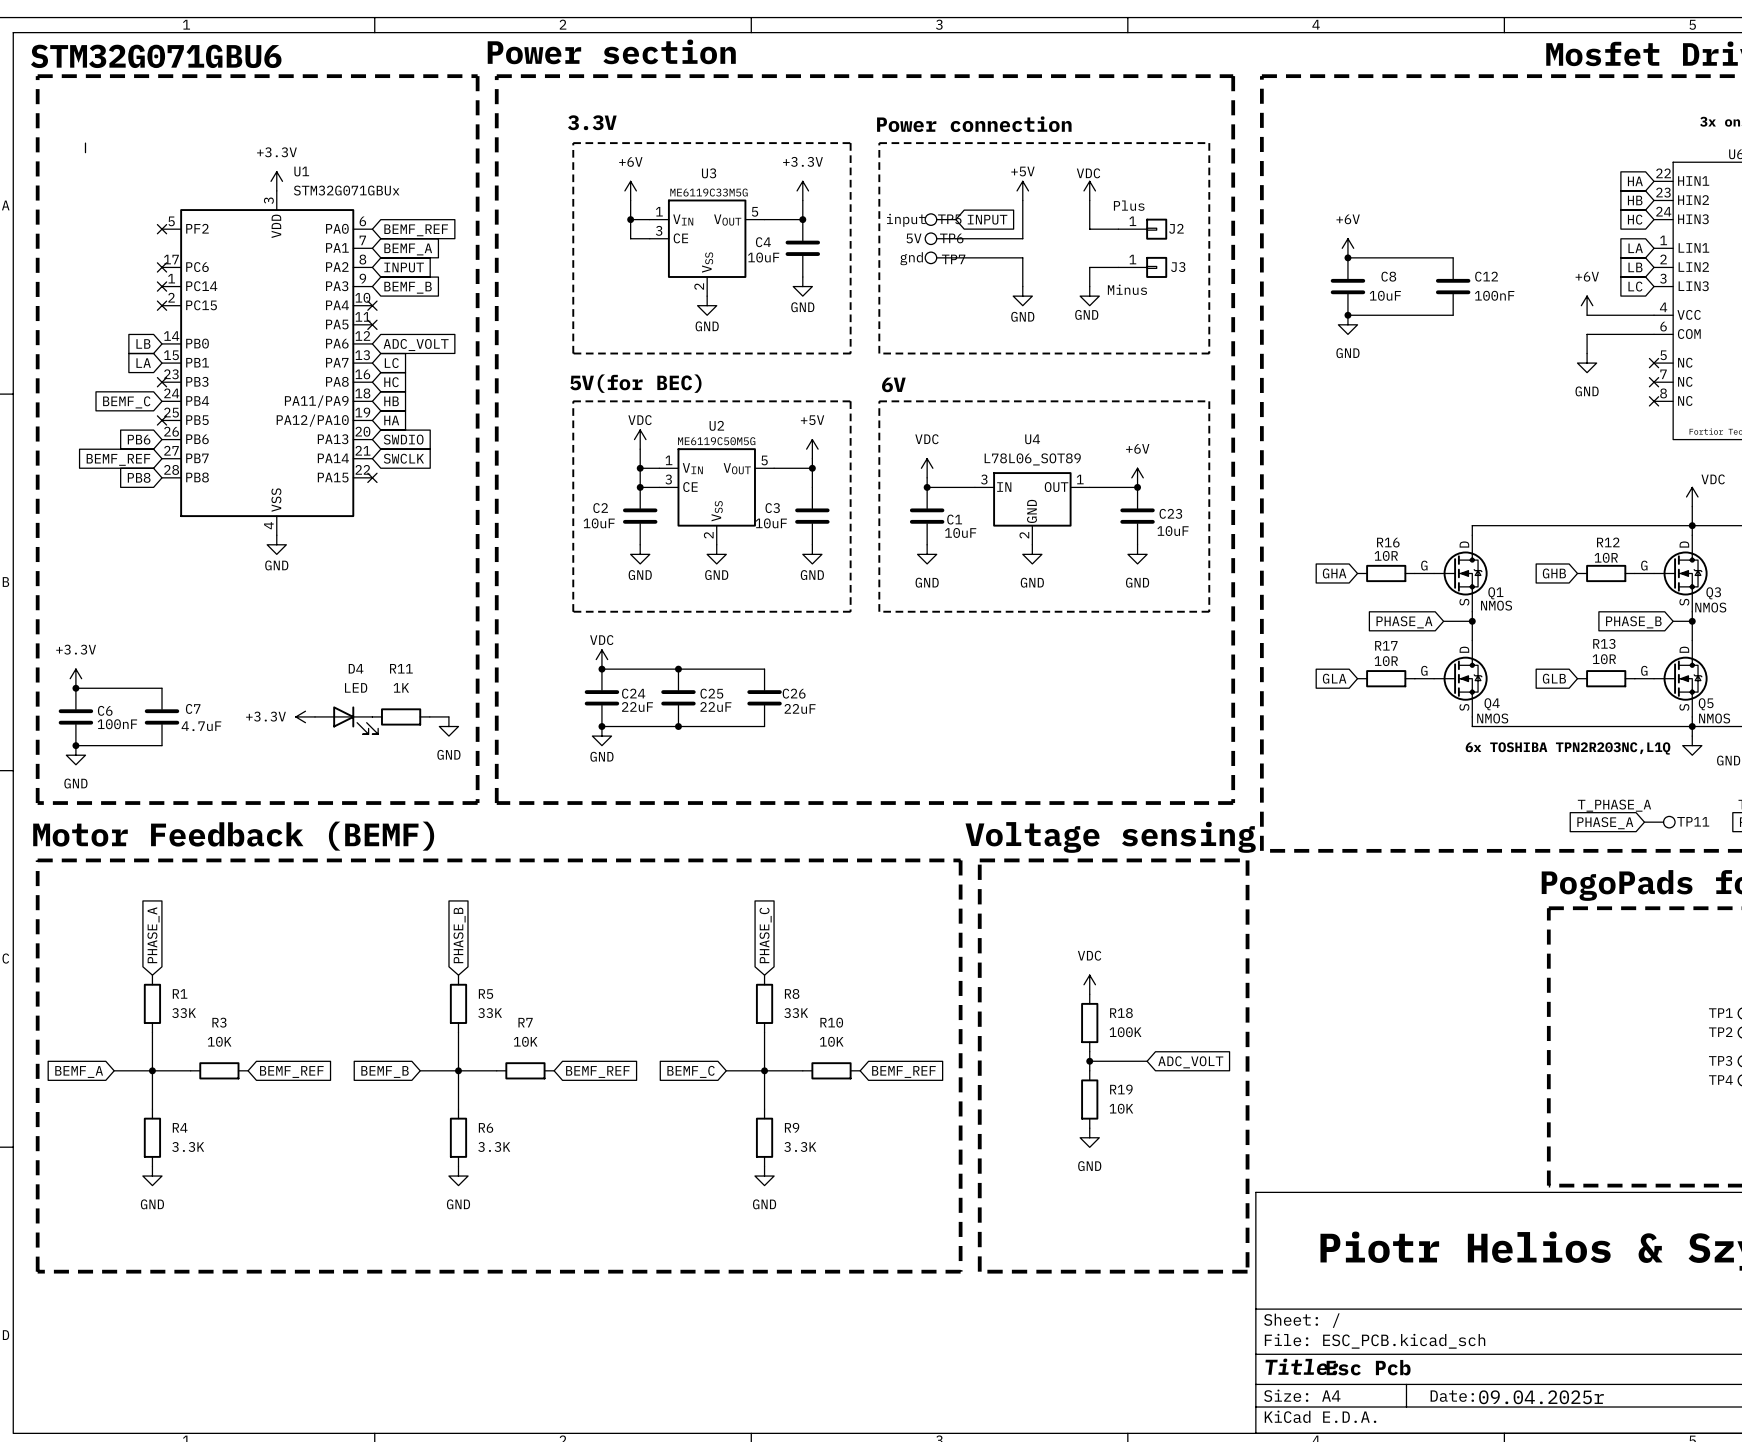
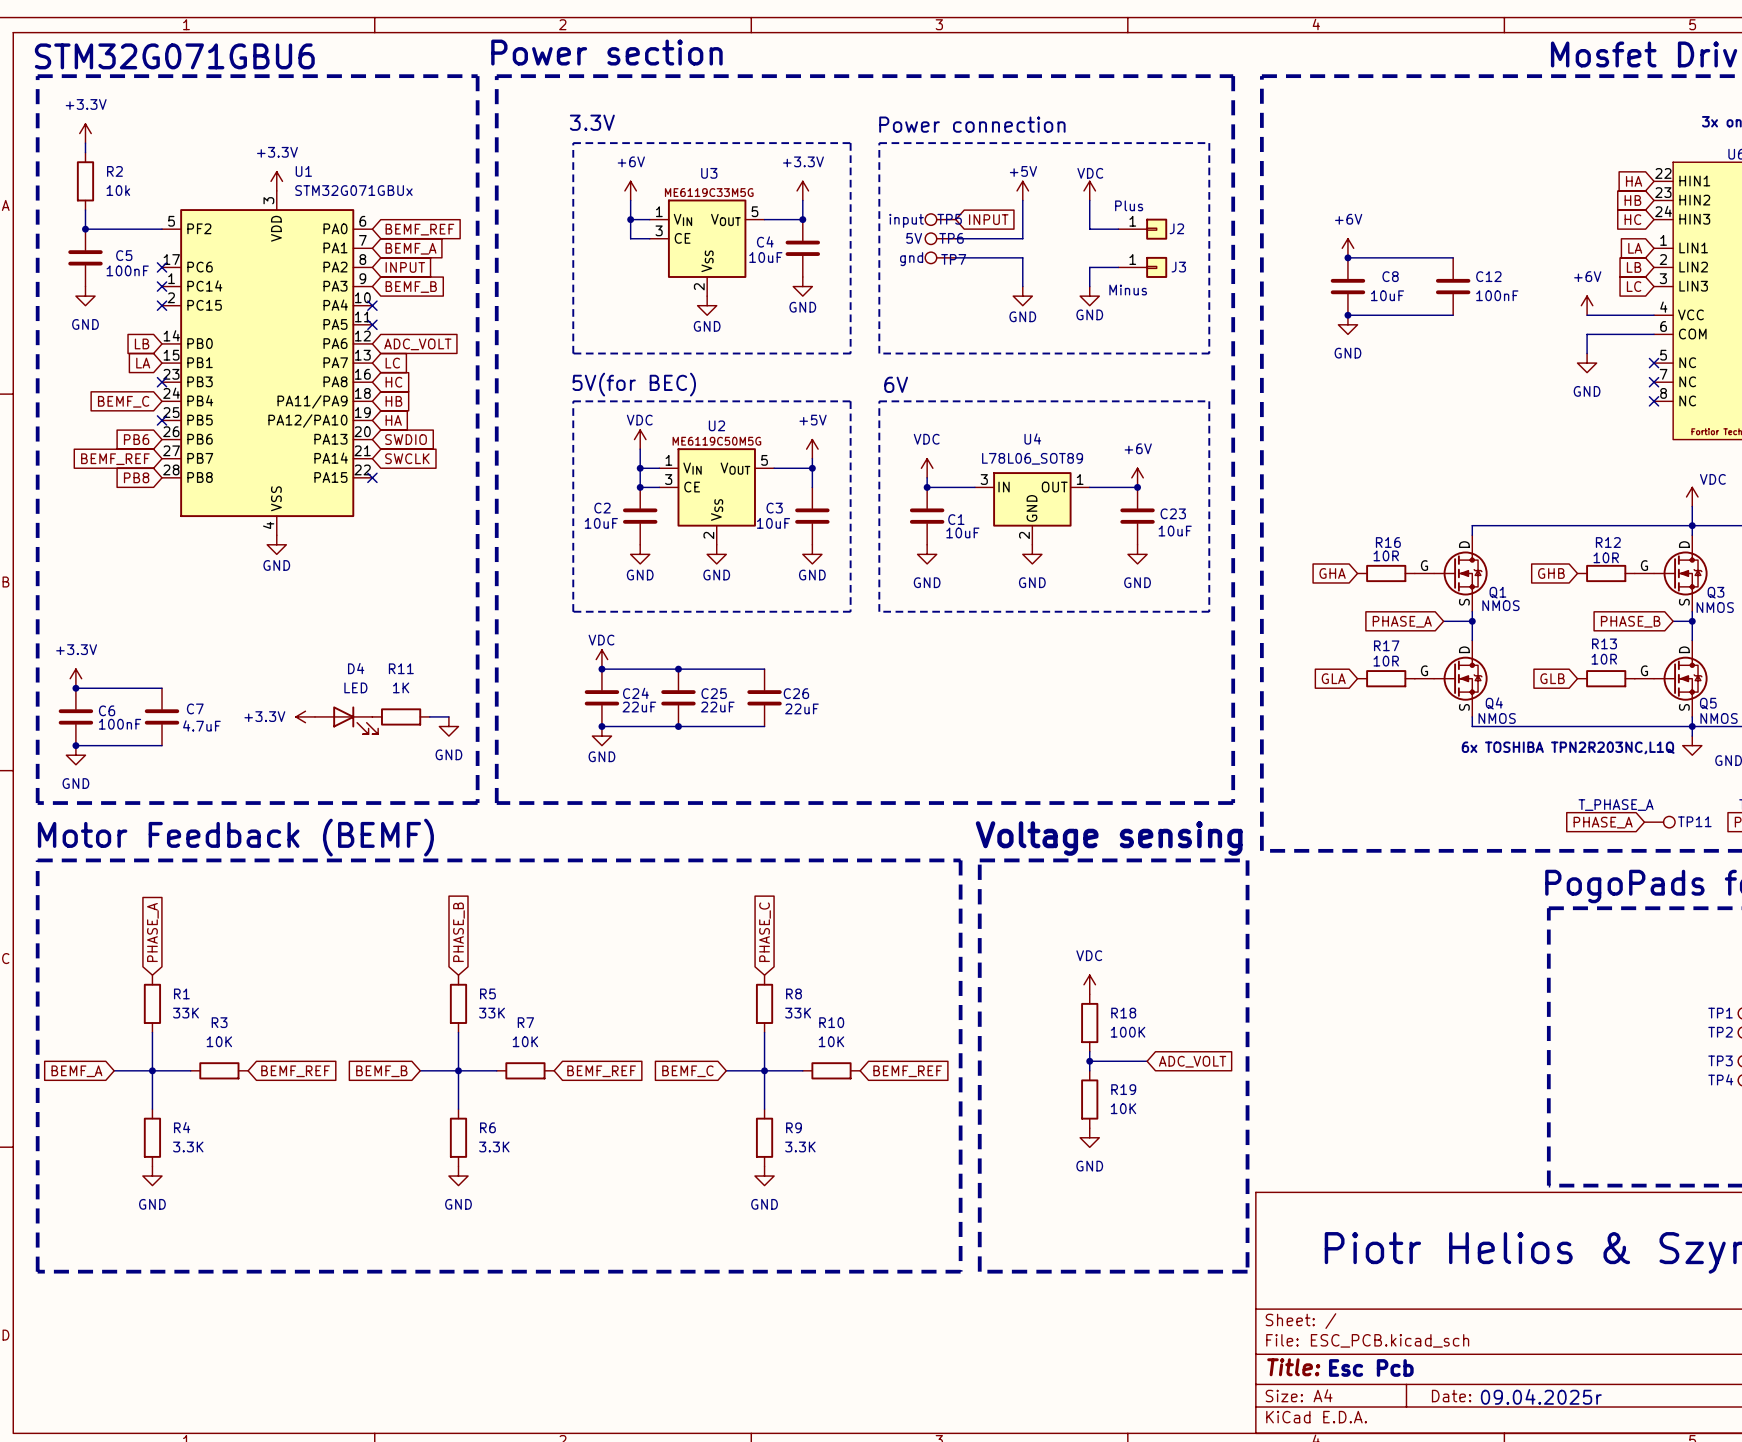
power symbol: none -> +3.3V (85, 133)
R2: none -> 10k (85, 181)
wire: none -> (85, 210) (85, 229) (162, 229)
junction: none -> (85, 229)
no-connect mark: (162, 229) -> none
C5: none -> 100nF (85, 257)
power symbol: none -> GND (85, 296)

